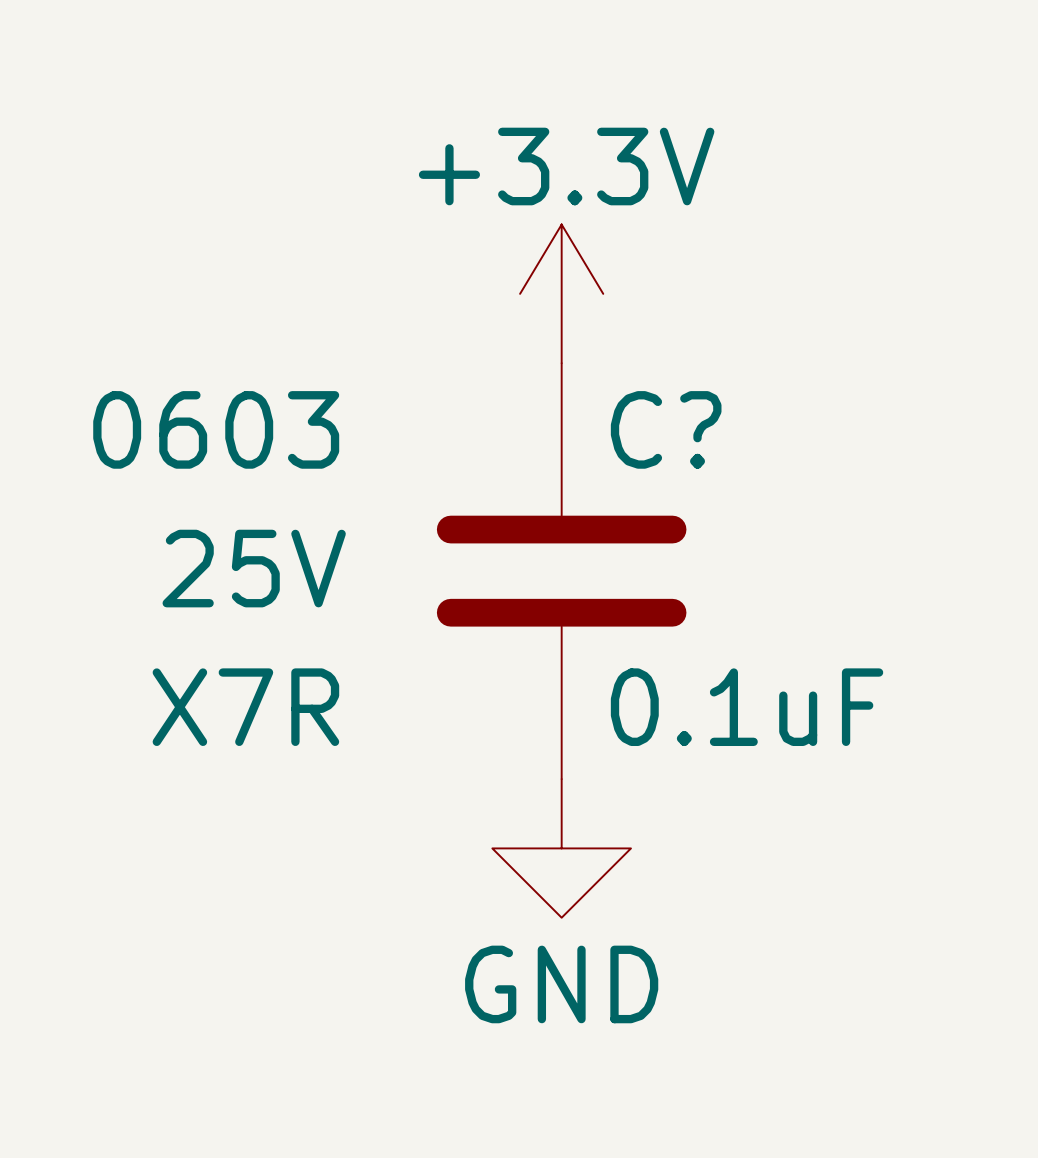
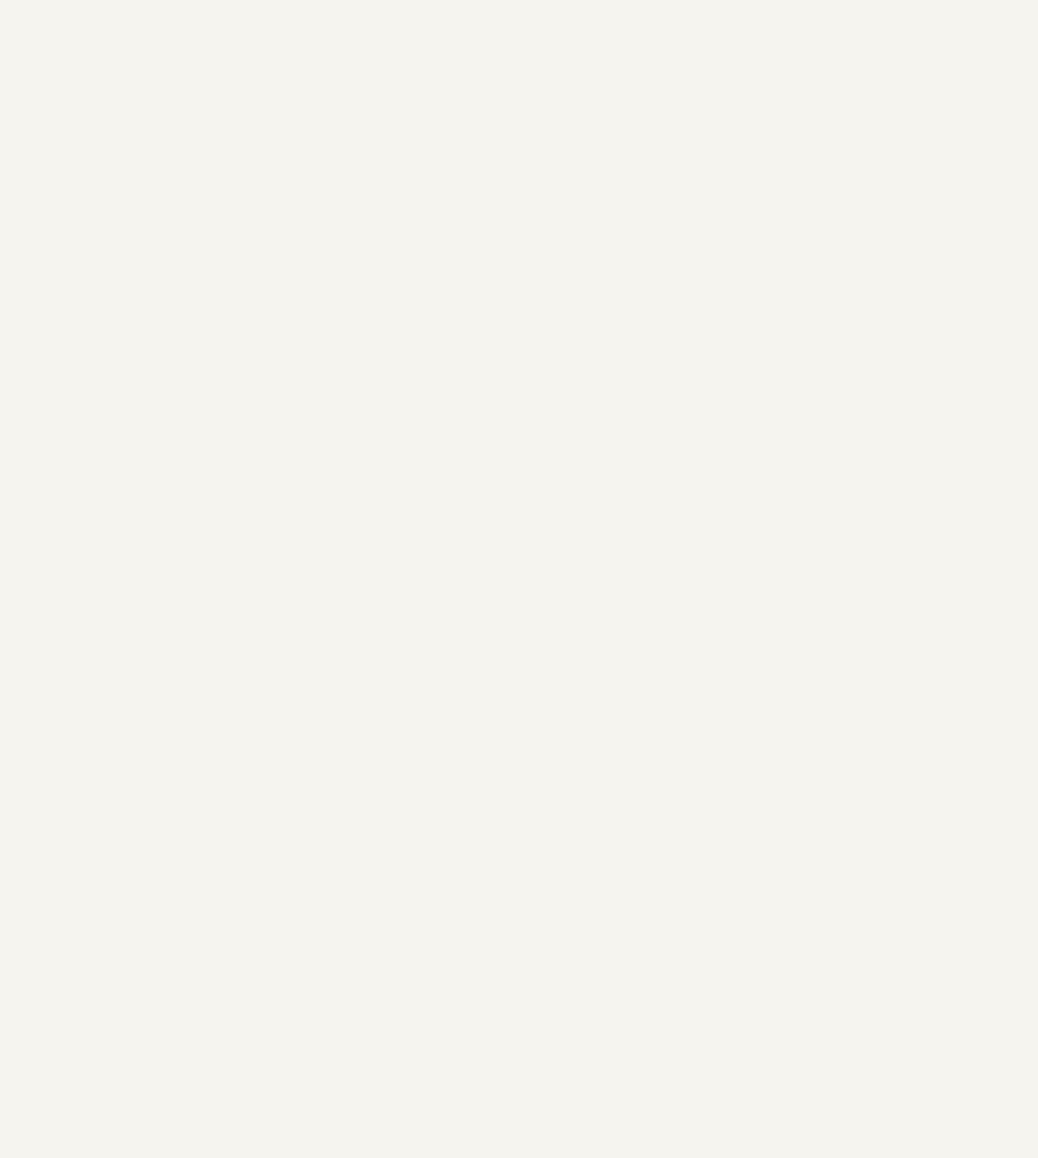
power symbol: +3.3V (561, 293) -> none
C?: 0.1uF (561, 571) -> none
power symbol: GND (561, 848) -> none

